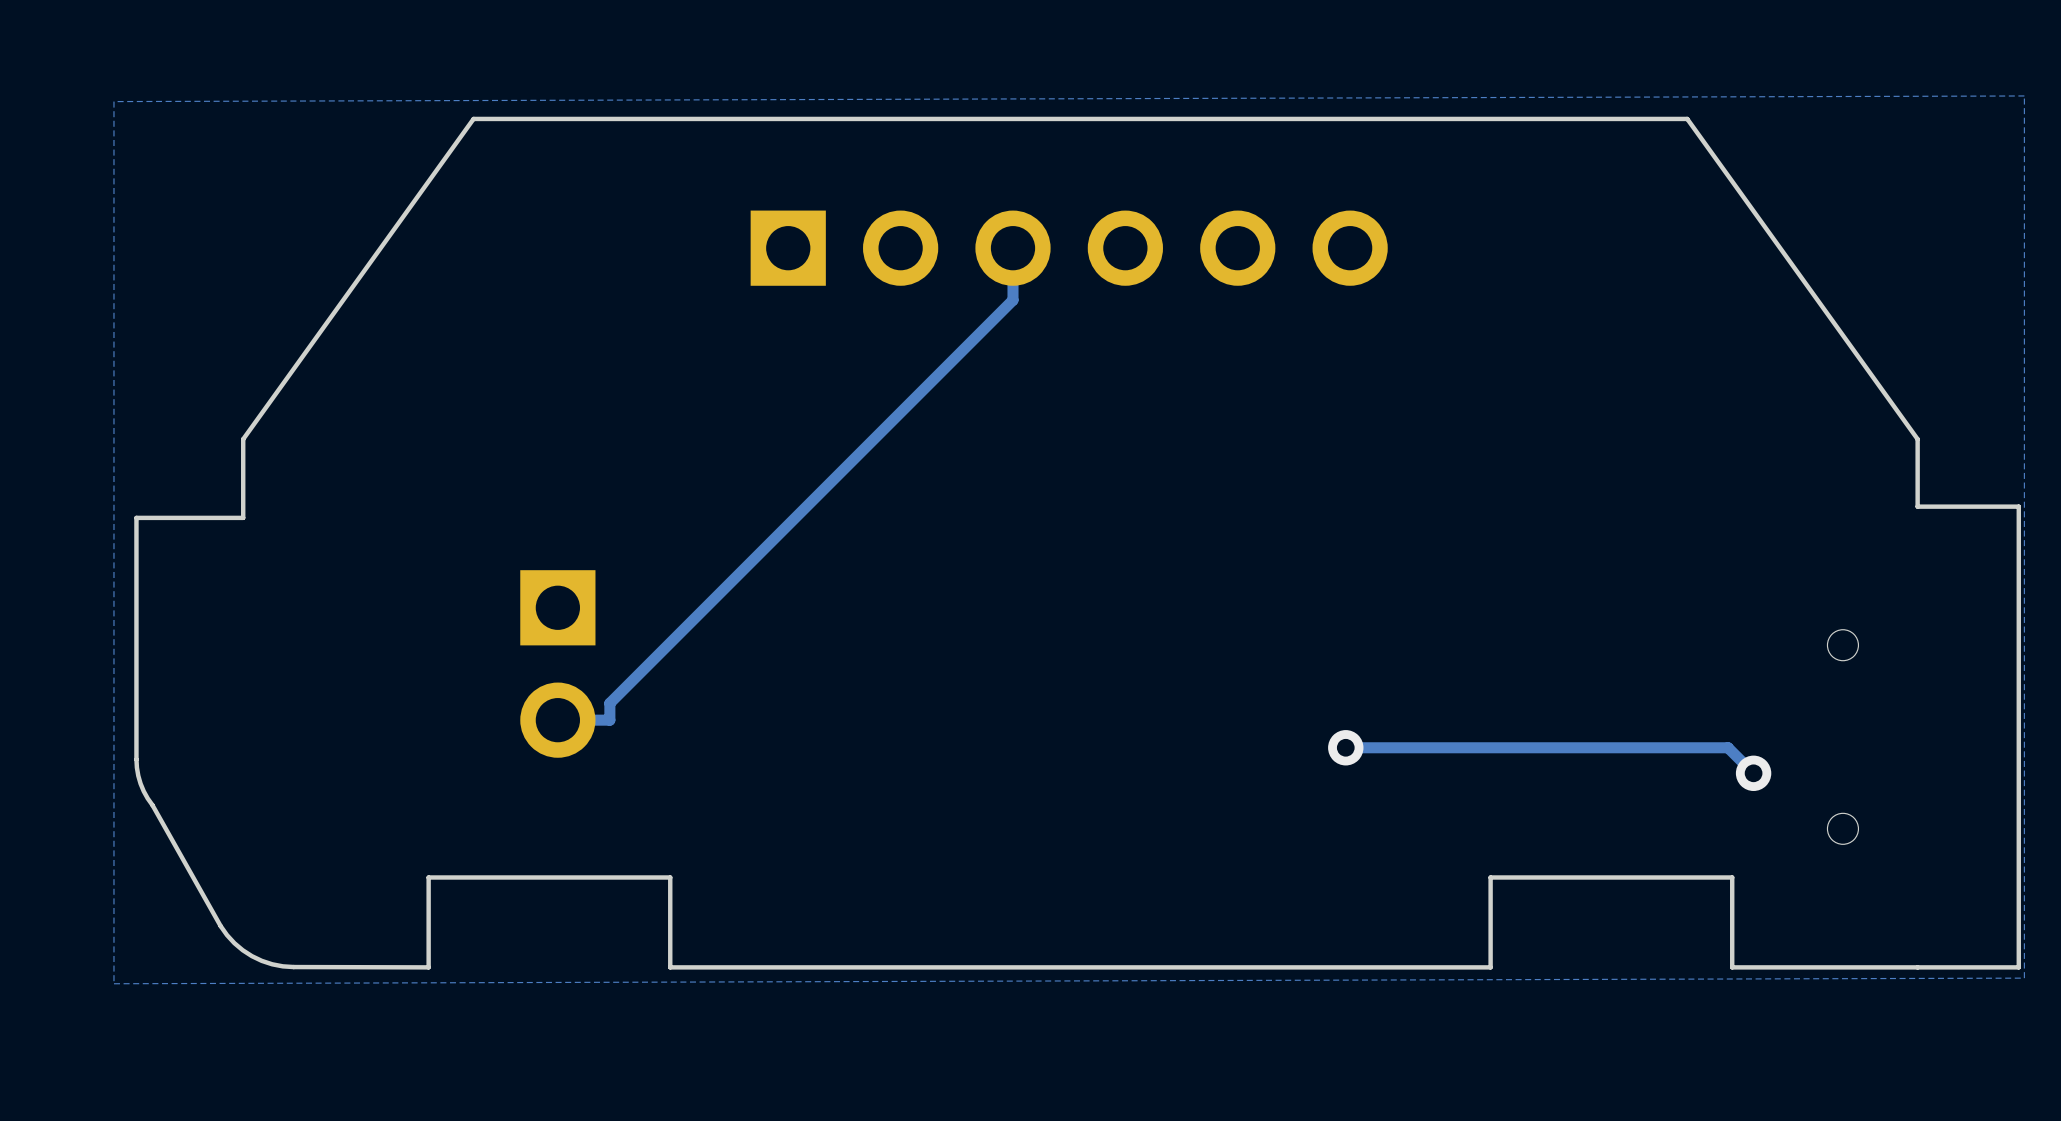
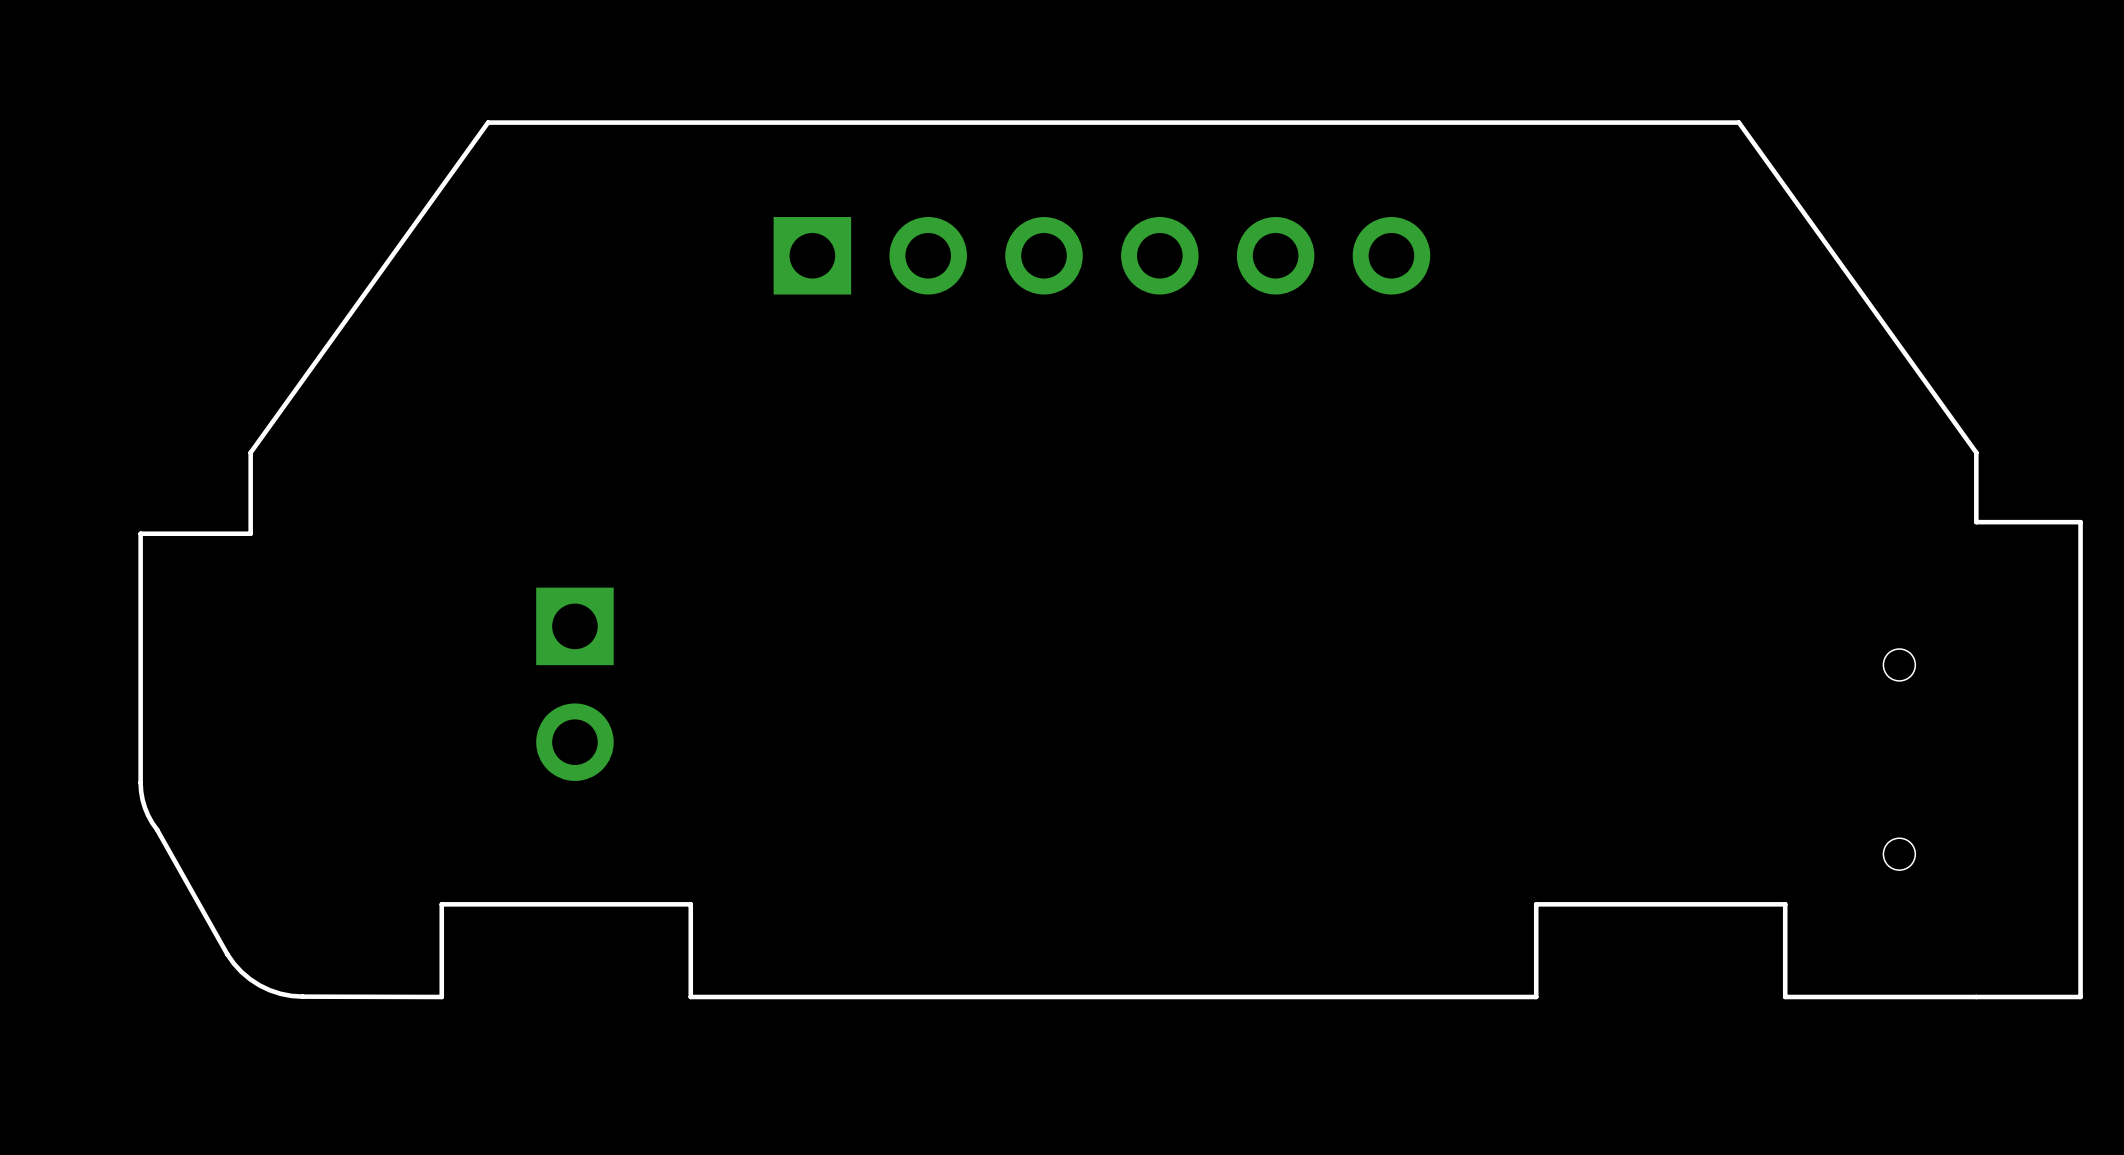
zone outline: (2024, 95) (2024, 978) (113, 983) (113, 101) (2024, 95) -> none
track: (1013, 248) (1013, 300) (609, 703) (609, 720) (557, 720) -> none
track: (1345, 747) (1728, 747) (1753, 773) -> none
via: (1345, 747) -> none
via: (1753, 773) -> none

